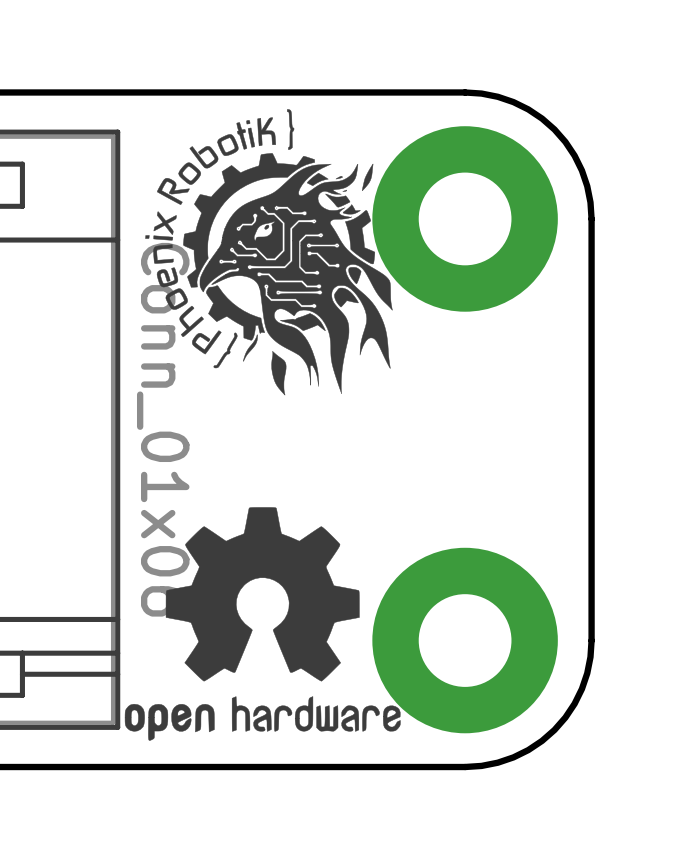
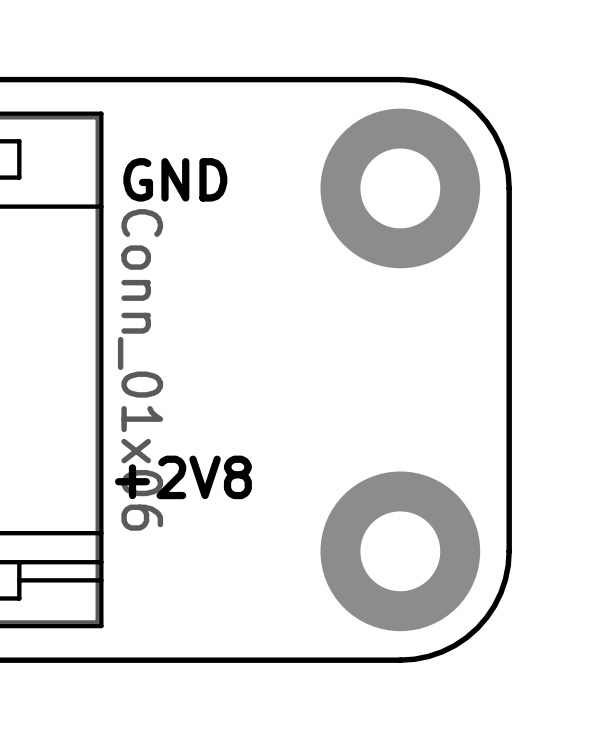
drawing: [145, 109, 393, 396] -> none
text: none -> GND (175, 179)
drawing: [124, 507, 401, 741] -> none
text: none -> +2V8 (183, 477)

